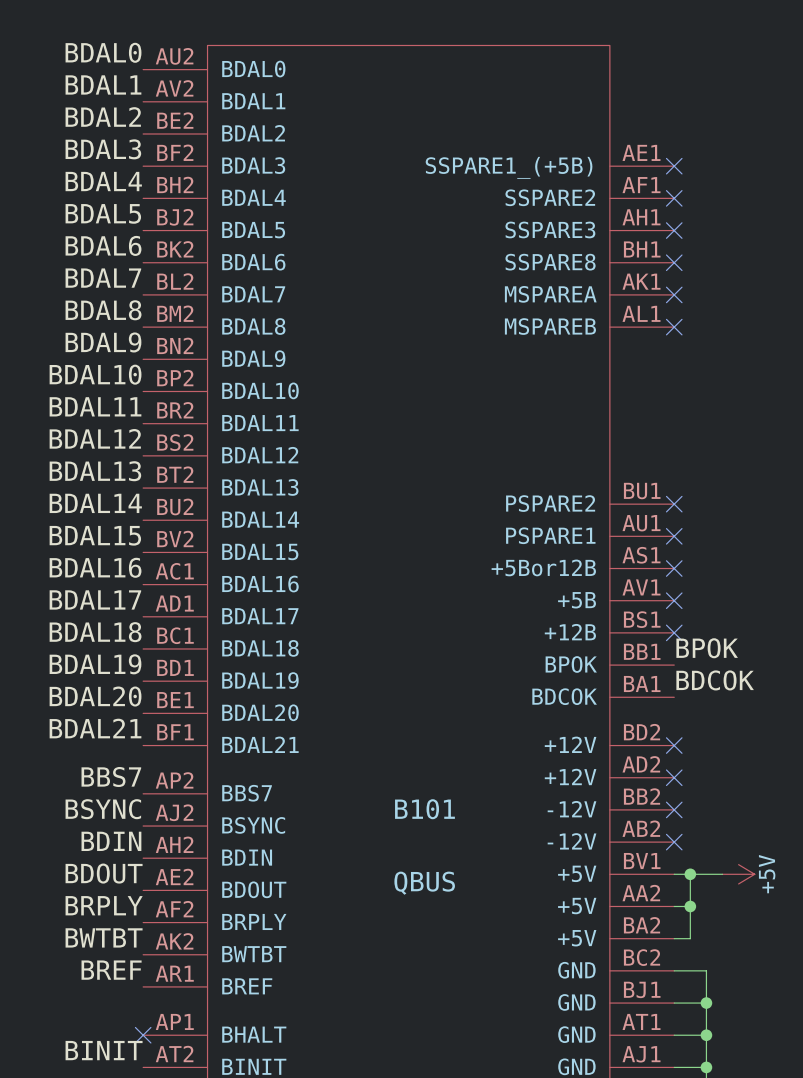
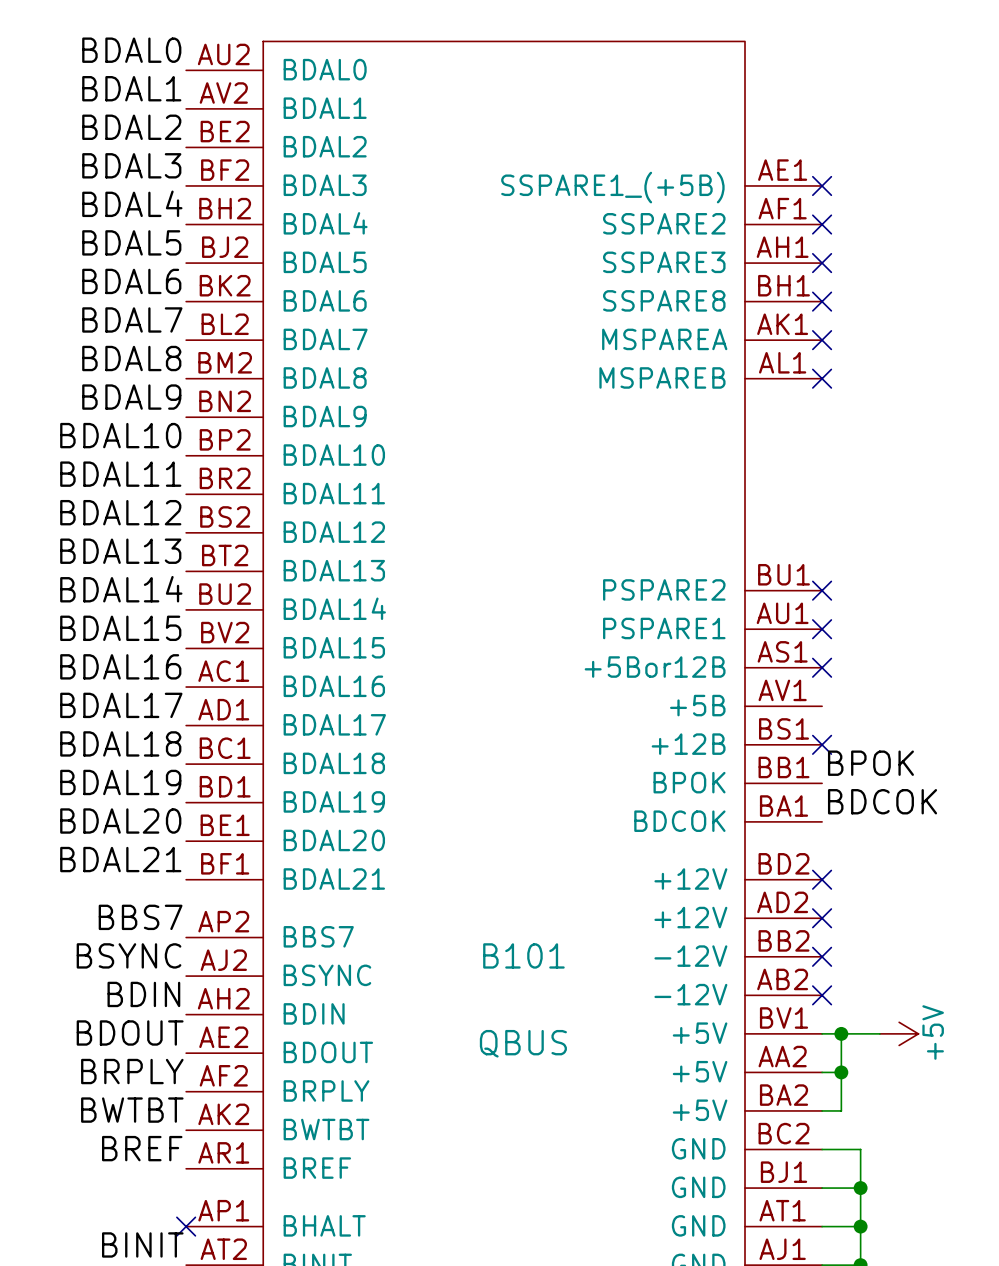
no-connect mark: (674, 600) -> none

